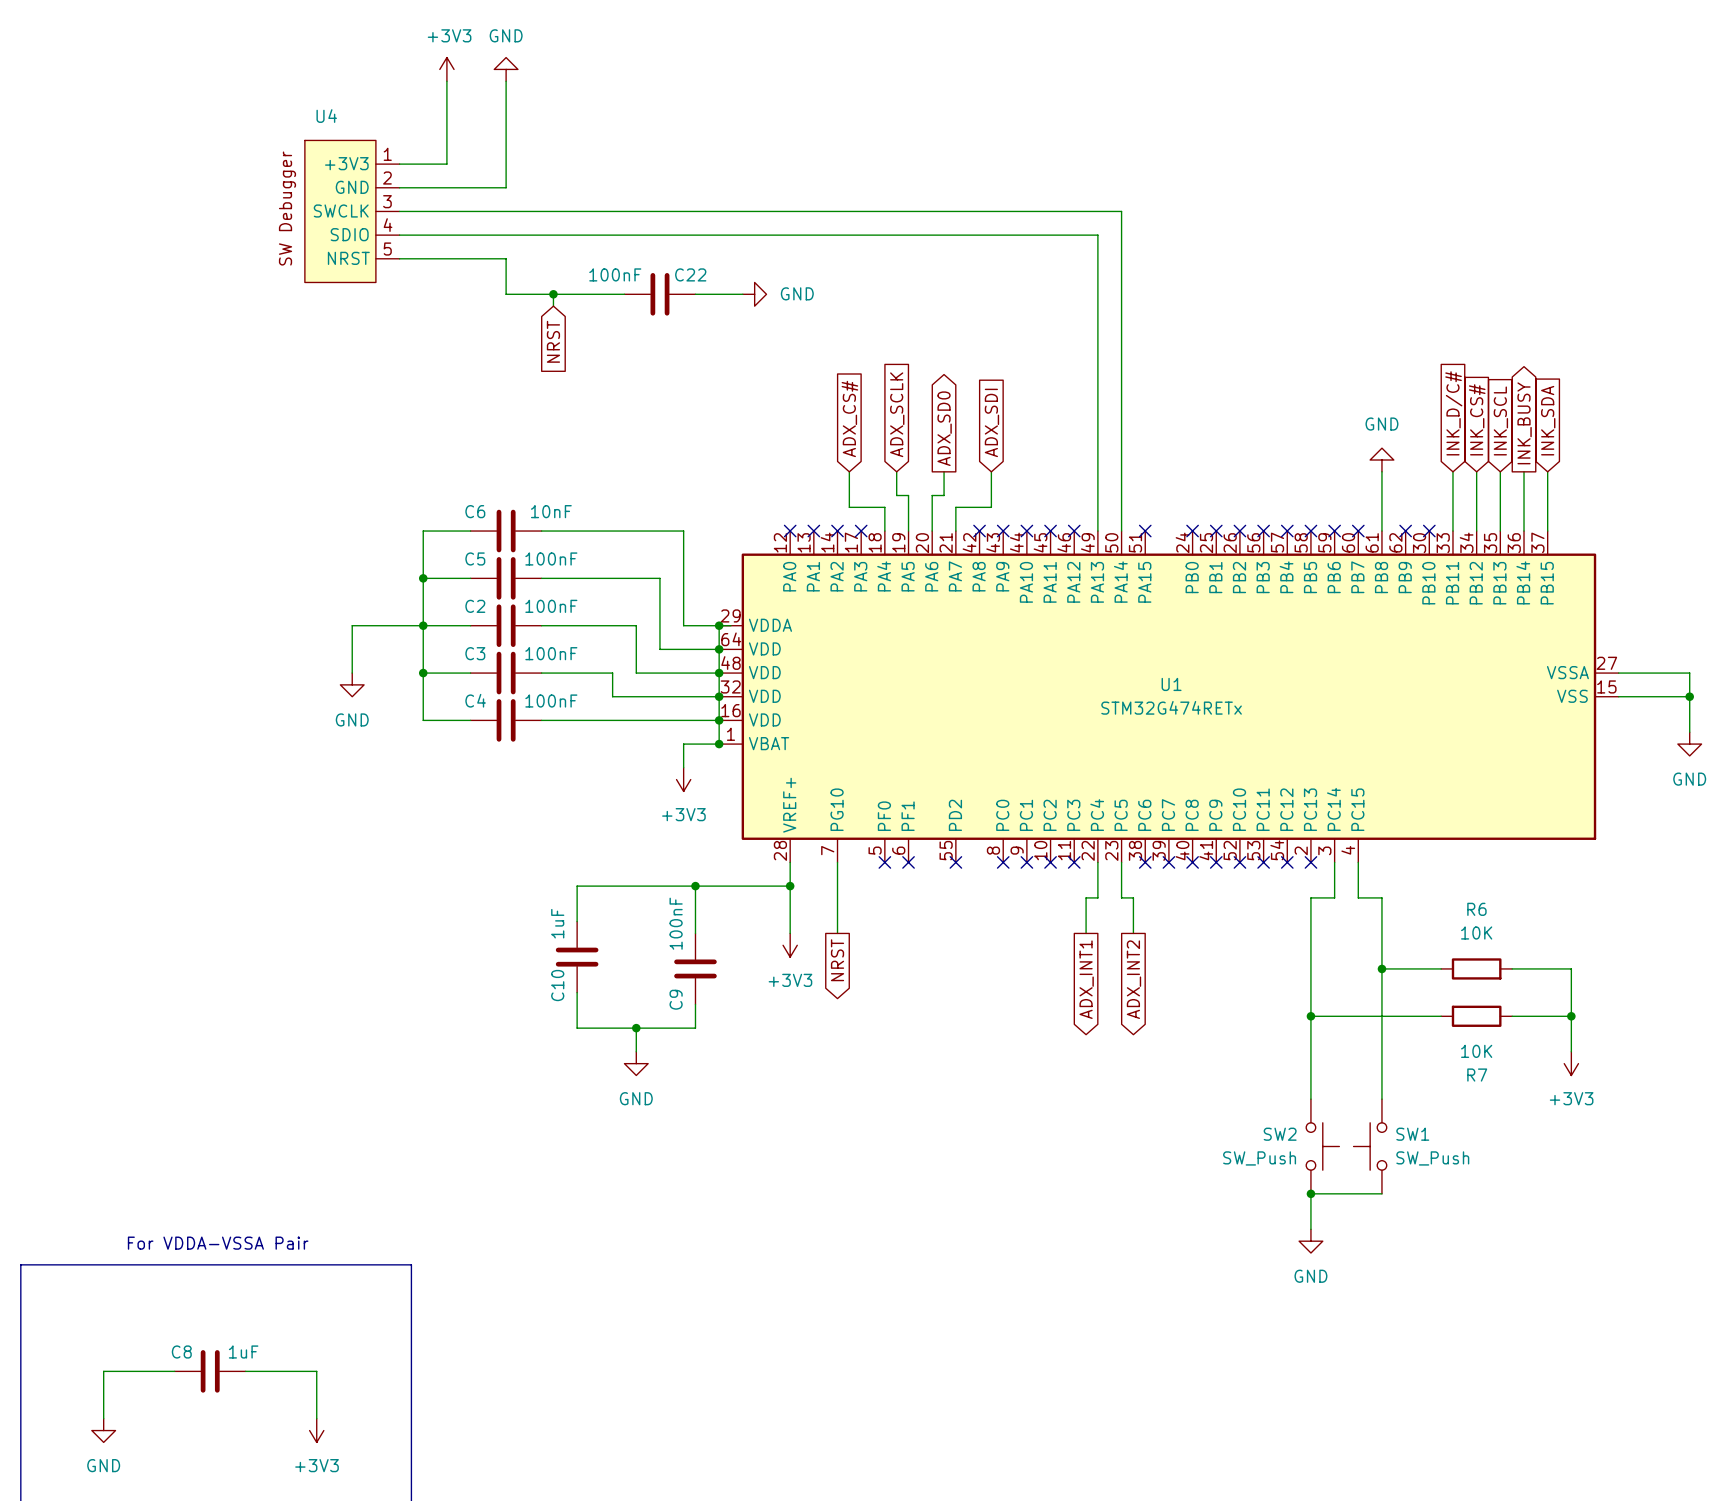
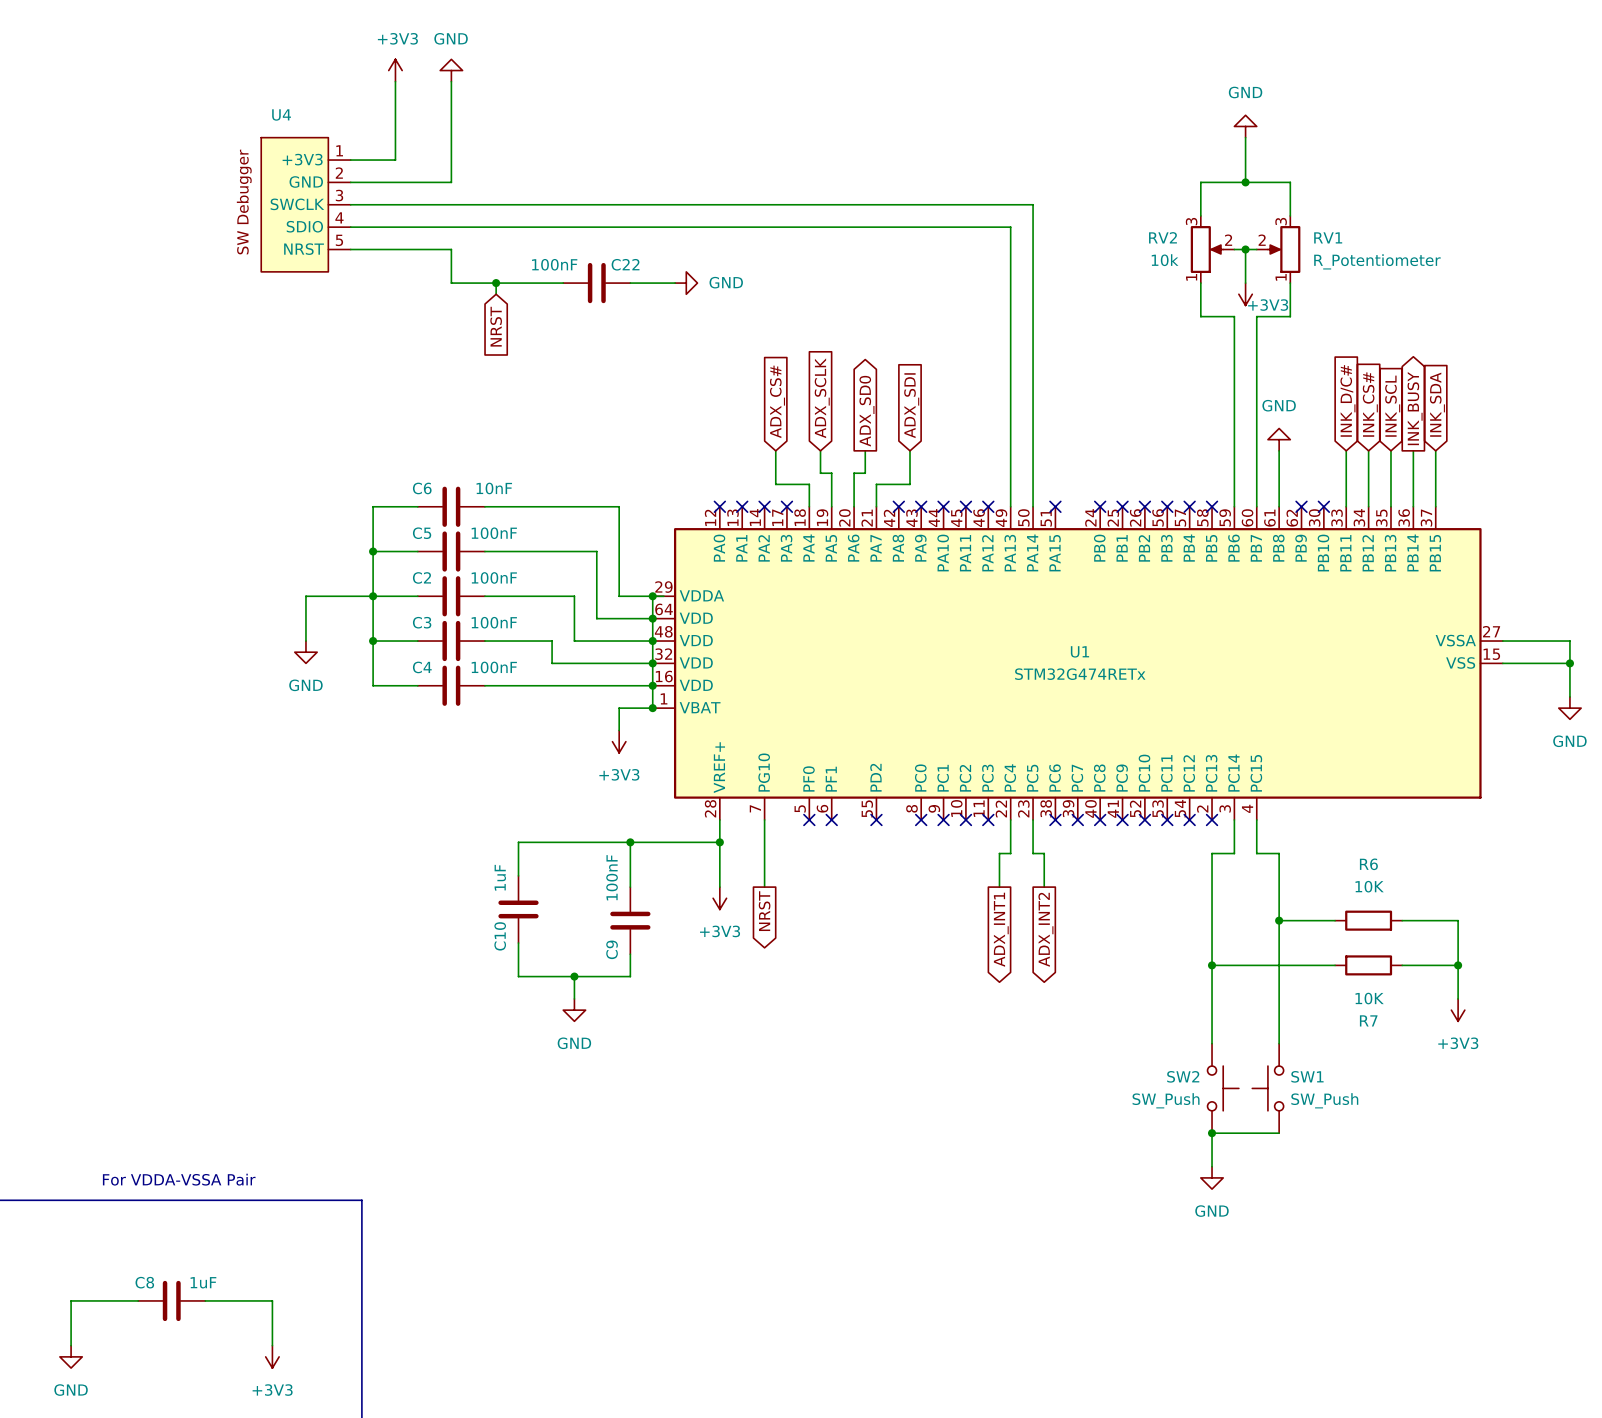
power symbol: none -> GND (1245, 126)
wire: none -> (1245, 137) (1245, 182)
junction: none -> (1245, 182)
wire: none -> (1200, 215) (1200, 182) (1290, 182) (1290, 215)
RV2: none -> 10k (1212, 249)
wire: none -> (1234, 249) (1256, 249)
wire: none -> (1245, 249) (1245, 283)
junction: none -> (1245, 249)
RV1: none -> R_Potentiometer (1278, 249)
wire: none -> (1200, 283) (1200, 316) (1234, 316) (1234, 506)
wire: none -> (1290, 283) (1290, 316) (1256, 316) (1256, 506)
power symbol: none -> +3V3 (1245, 294)
no-connect mark: (1334, 531) -> none
no-connect mark: (1358, 531) -> none

